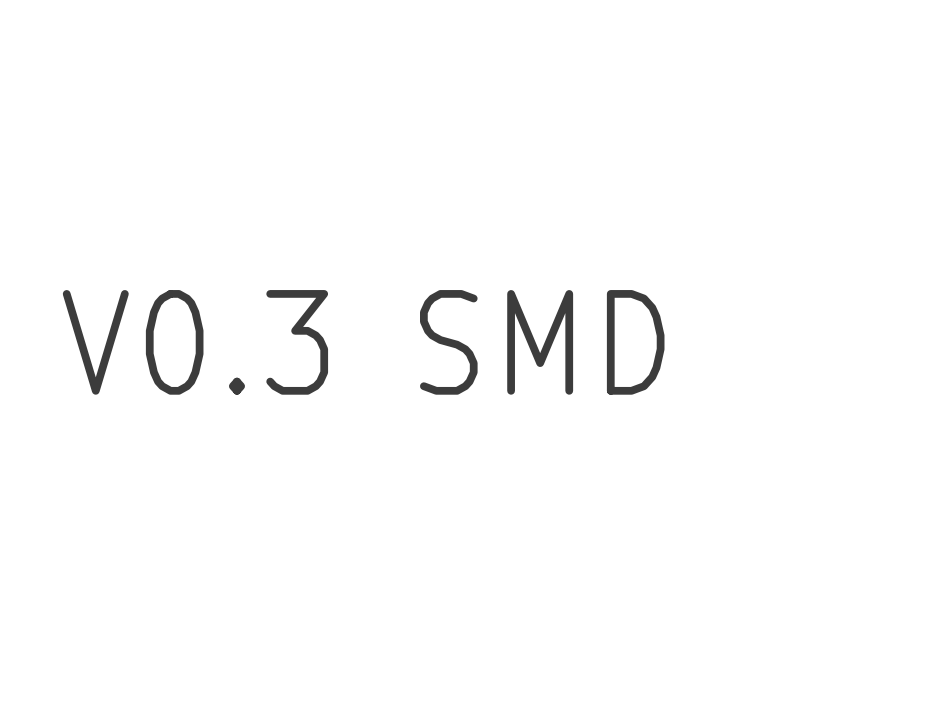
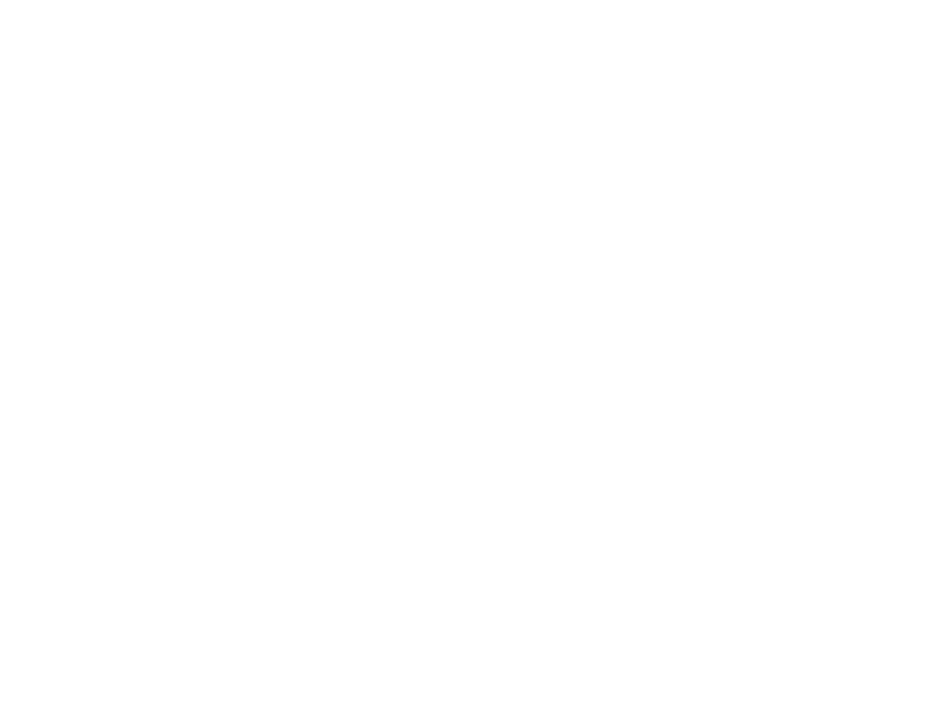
text: V0.3 SMD (363, 342) -> none

